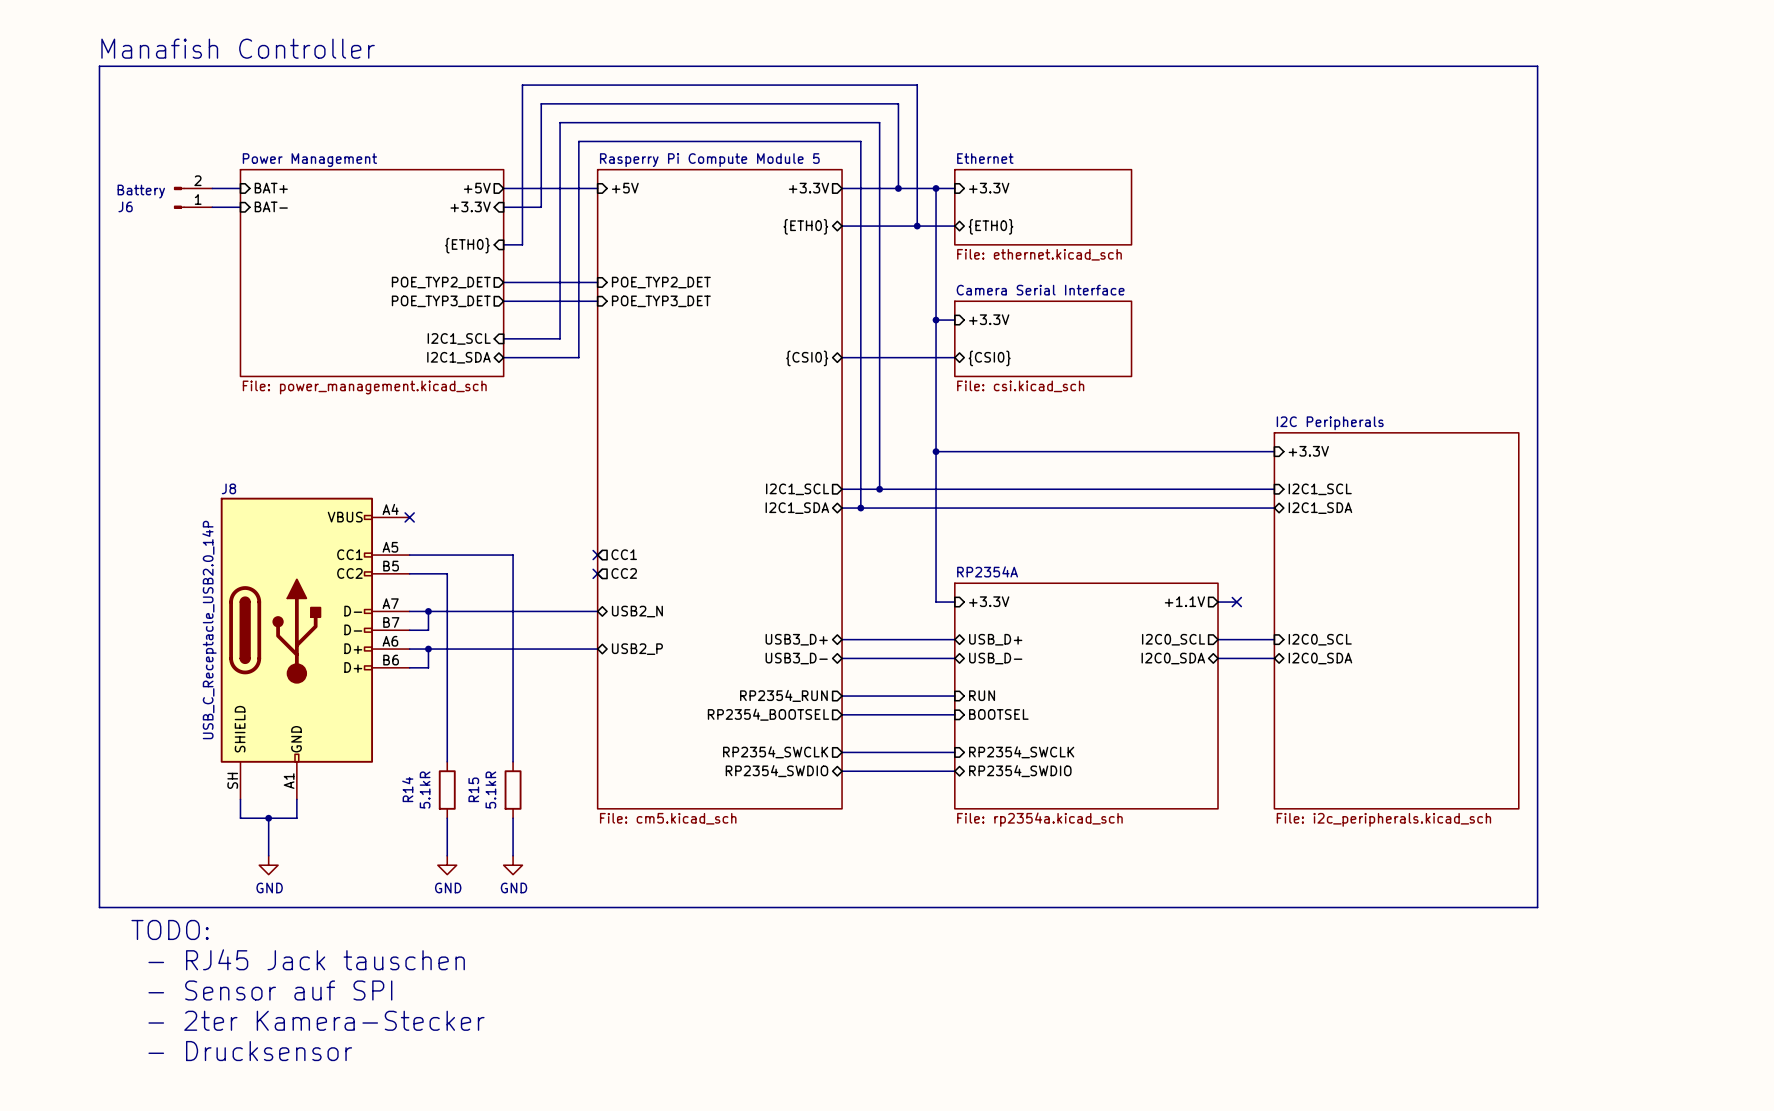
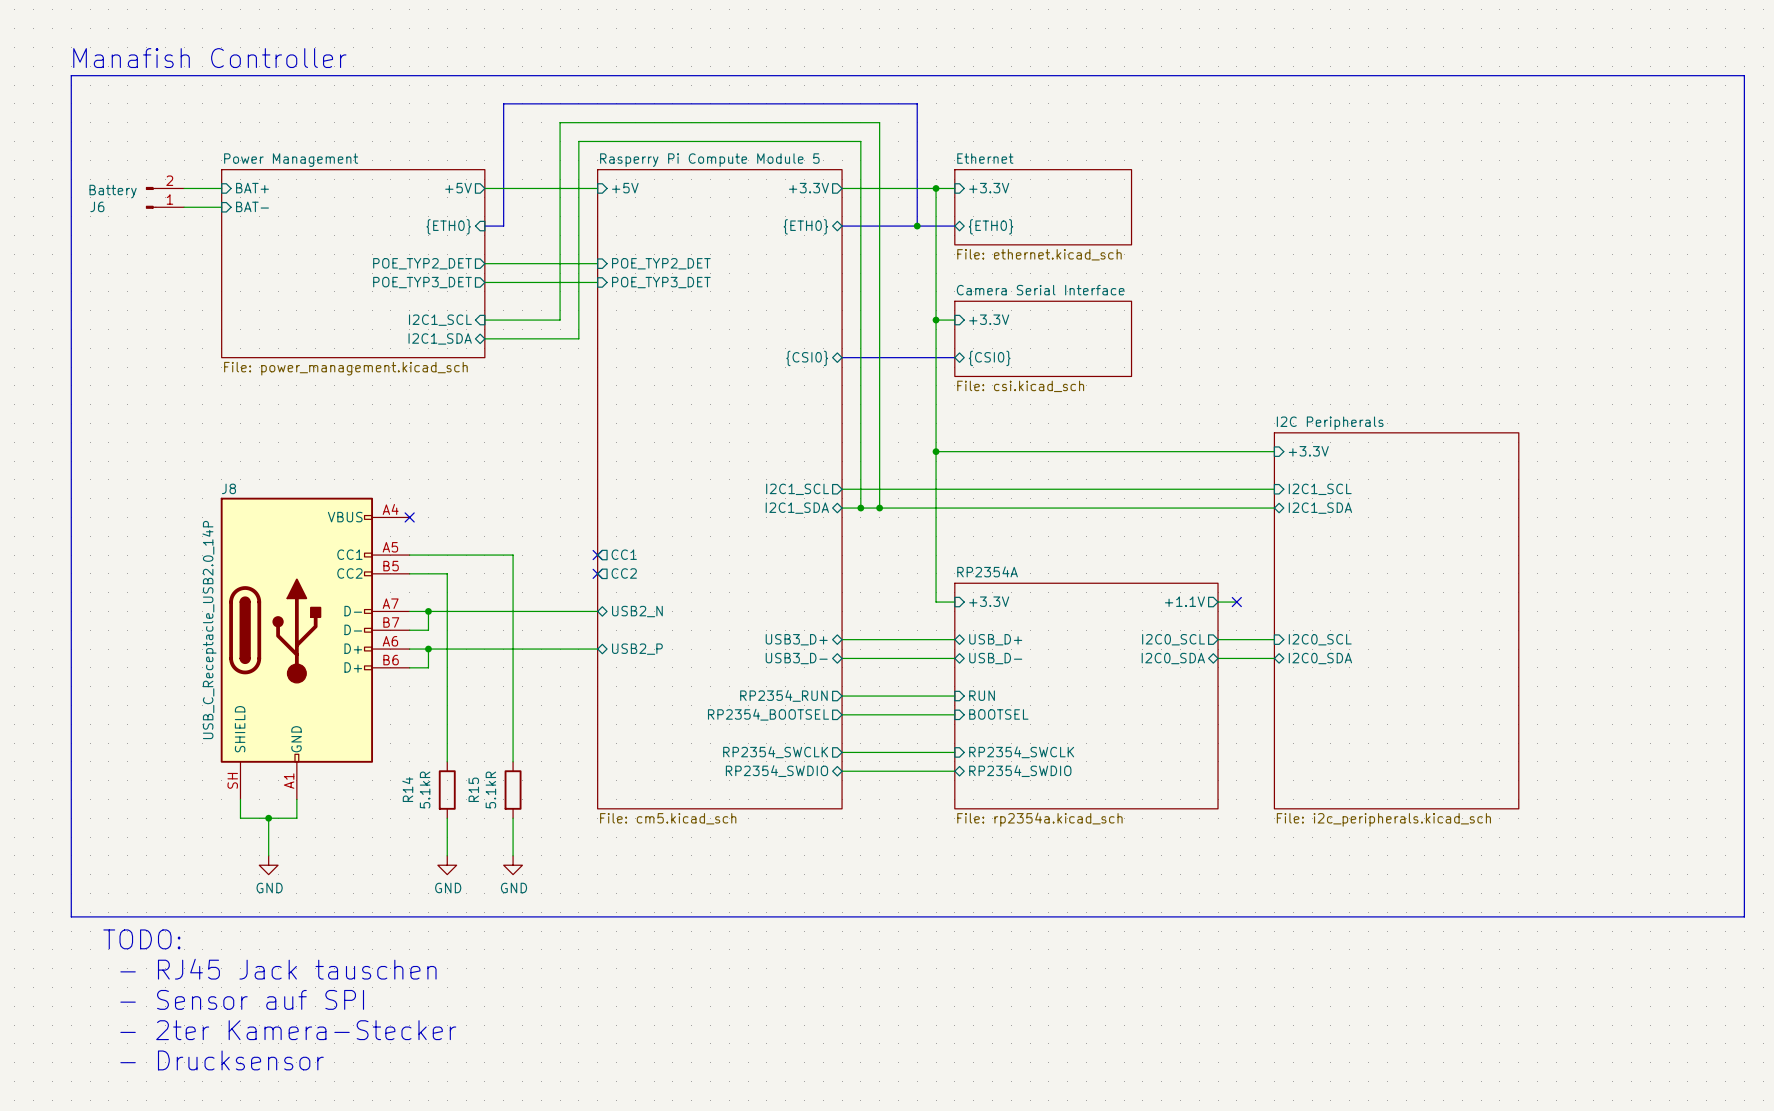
text position: Manafish Controller (238, 48) -> Manafish Controller (209, 58)
line: (99, 66) (1537, 66) (1537, 907) (99, 907) (99, 66) -> (71, 75) (71, 916) (1744, 916) (1744, 75) (71, 75)
bus: (917, 103) (917, 85) (522, 85) (522, 244) (503, 244) -> (917, 103) (503, 103) (503, 226) (484, 226)
wire: (221, 188) (240, 188) -> none
sheet pin position: BAT+ (271, 188) -> BAT+ (252, 188)
sheet pin position: +5V (477, 188) -> +5V (458, 188)
wire: none -> (484, 188) (503, 188)
wire: (898, 188) (898, 103) (541, 103) (541, 207) (503, 207) -> none
junction: (898, 188) -> none
J6 position: (193, 197) -> (164, 197)
sheet pin position: BAT- (271, 206) -> BAT- (252, 206)
sheet pin: +3.3V (470, 206) -> none
wire: (221, 207) (240, 207) -> none
sheet pin position: {ETH0} (467, 245) -> {ETH0} (448, 226)
sheet Power Management: none -> File: power_management.kicad_sch (353, 263)
wire: none -> (484, 263) (597, 263)
sheet pin: none -> POE_TYP2_DET (661, 263)
sheet Power Management: File: power_management.kicad_sch (372, 273) -> none
sheet pin position: POE_TYP2_DET (441, 282) -> POE_TYP2_DET (422, 263)
wire: none -> (484, 282) (503, 282)
sheet pin: POE_TYP2_DET (661, 282) -> POE_TYP3_DET (661, 282)
sheet pin position: POE_TYP3_DET (441, 301) -> POE_TYP3_DET (422, 282)
wire: (503, 301) (597, 301) -> none
sheet pin: POE_TYP3_DET (661, 301) -> none
wire: none -> (484, 320) (560, 320)
wire: (560, 320) (560, 338) -> (578, 338) (560, 338)
sheet pin position: I2C1_SCL (459, 338) -> I2C1_SCL (440, 320)
wire: none -> (484, 338) (503, 338)
wire: (578, 338) (578, 357) (503, 357) -> none
sheet pin position: I2C1_SDA (458, 357) -> I2C1_SDA (440, 338)
wire: none -> (879, 489) (879, 508)
junction position: (879, 489) -> (879, 508)
text position: TODO: (170, 929) -> TODO: (141, 939)
text position: - RJ45 Jack tauschen (306, 959) -> - RJ45 Jack tauschen (278, 969)
text position: - Sensor auf SPI (270, 990) -> - Sensor auf SPI (242, 999)
text position: - 2ter Kamera-Stecker (316, 1020) -> - 2ter Kamera-Stecker (288, 1030)
text position: - Drucksensor (250, 1051) -> - Drucksensor (222, 1060)

